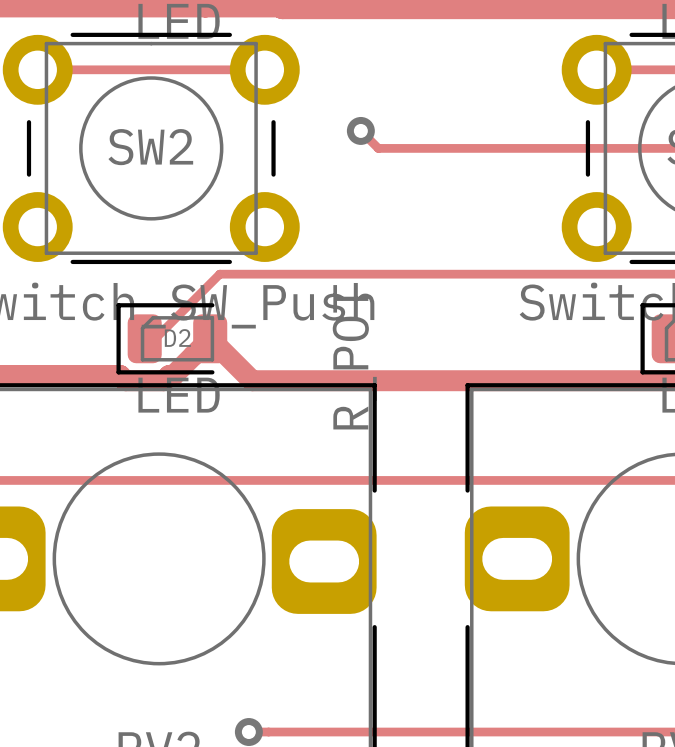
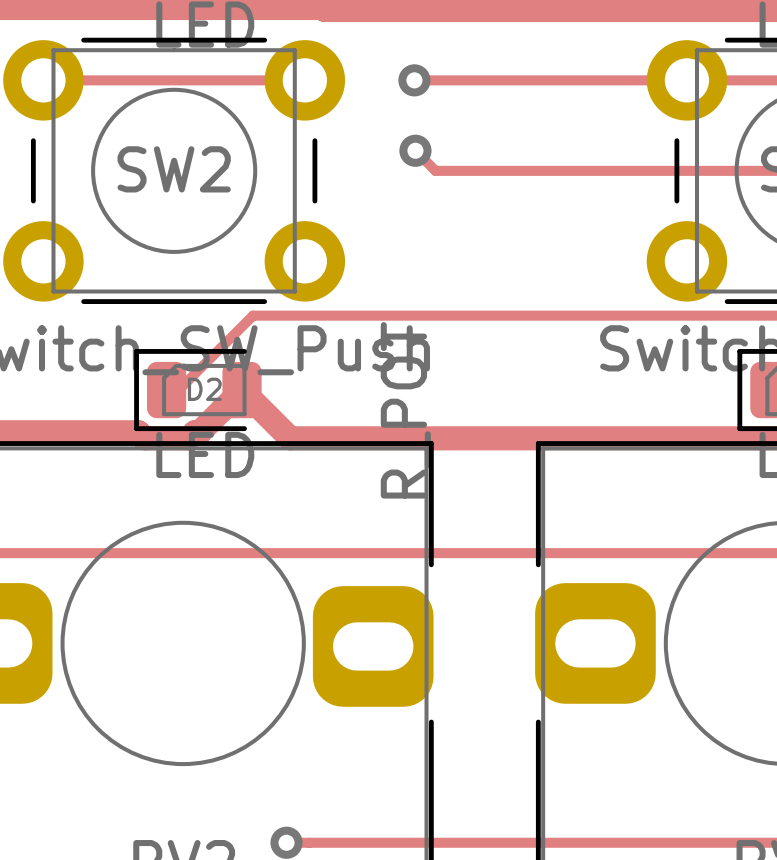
track: none -> (414, 80) (686, 80)
via: none -> (414, 80)

